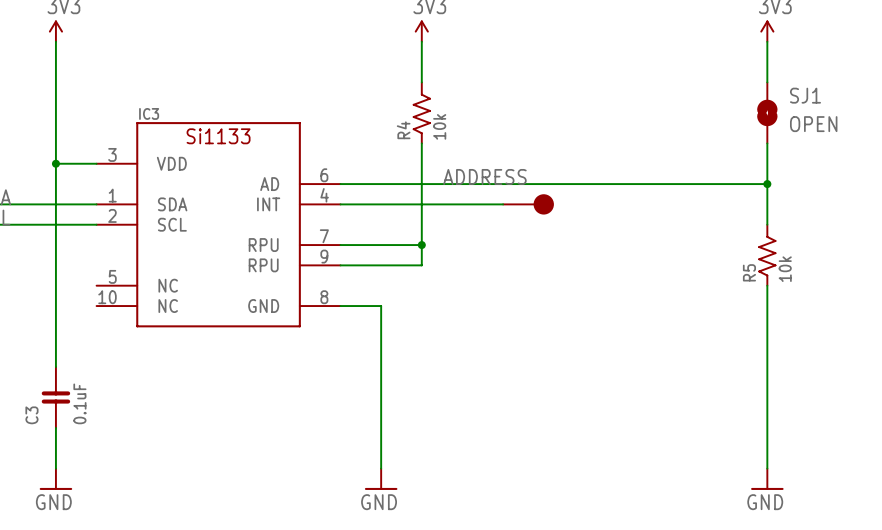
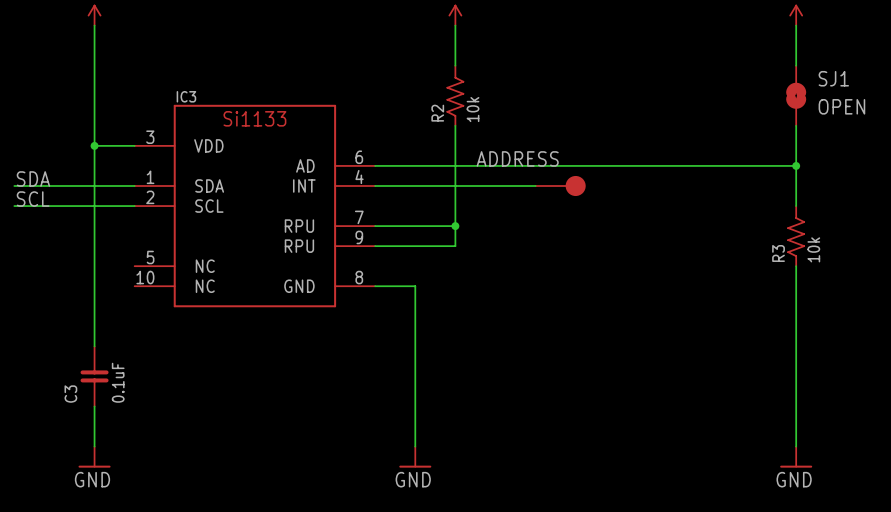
R4 name: R4 (403, 130) -> R2 (437, 113)
R5 name: R5 (749, 272) -> R3 (778, 253)

